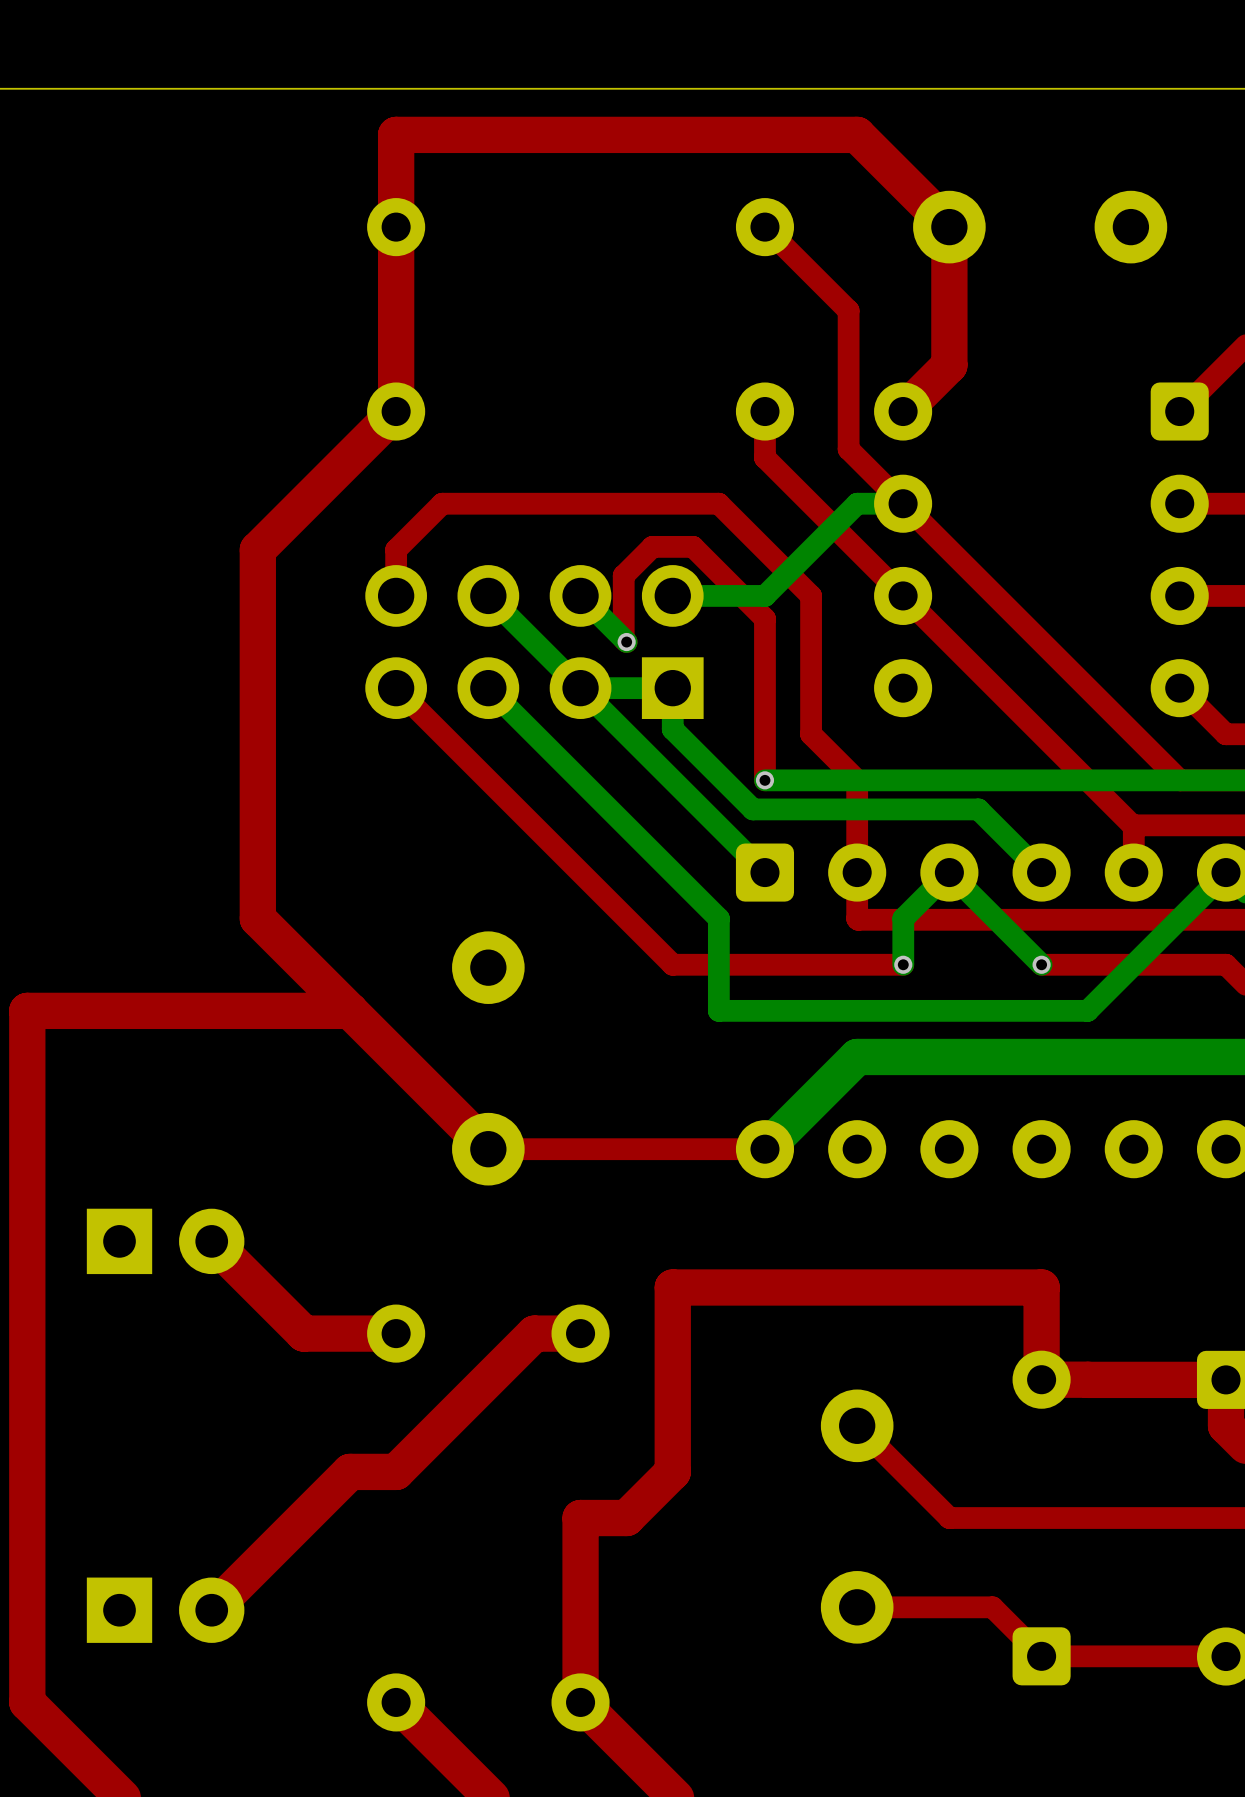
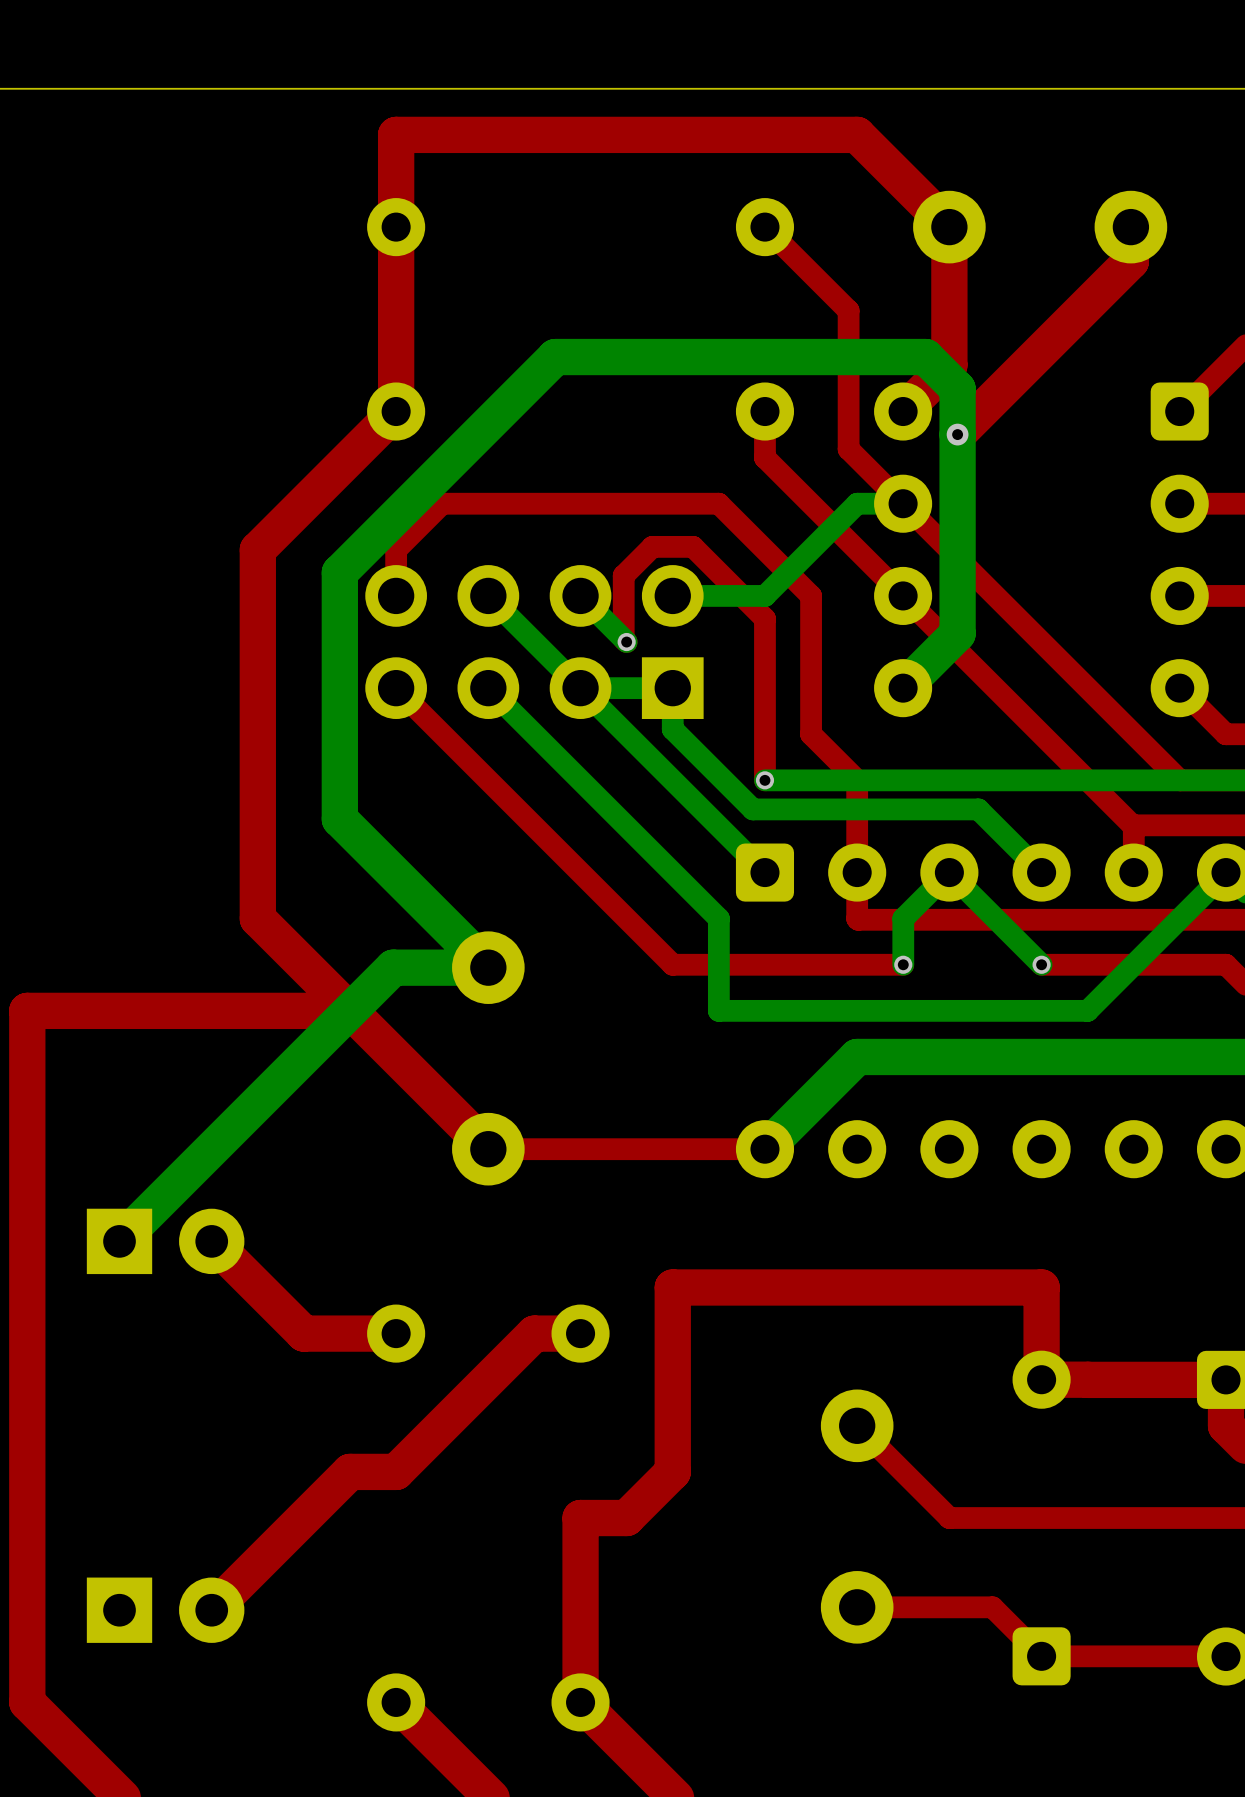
top track: none -> (1130, 227) (1130, 261) (957, 434)
via: none -> (957, 434)
bottom track: none -> (903, 688) (957, 633) (957, 388) (925, 357) (555, 357) (339, 572) (339, 819) (488, 967) (393, 967) (119, 1241)

